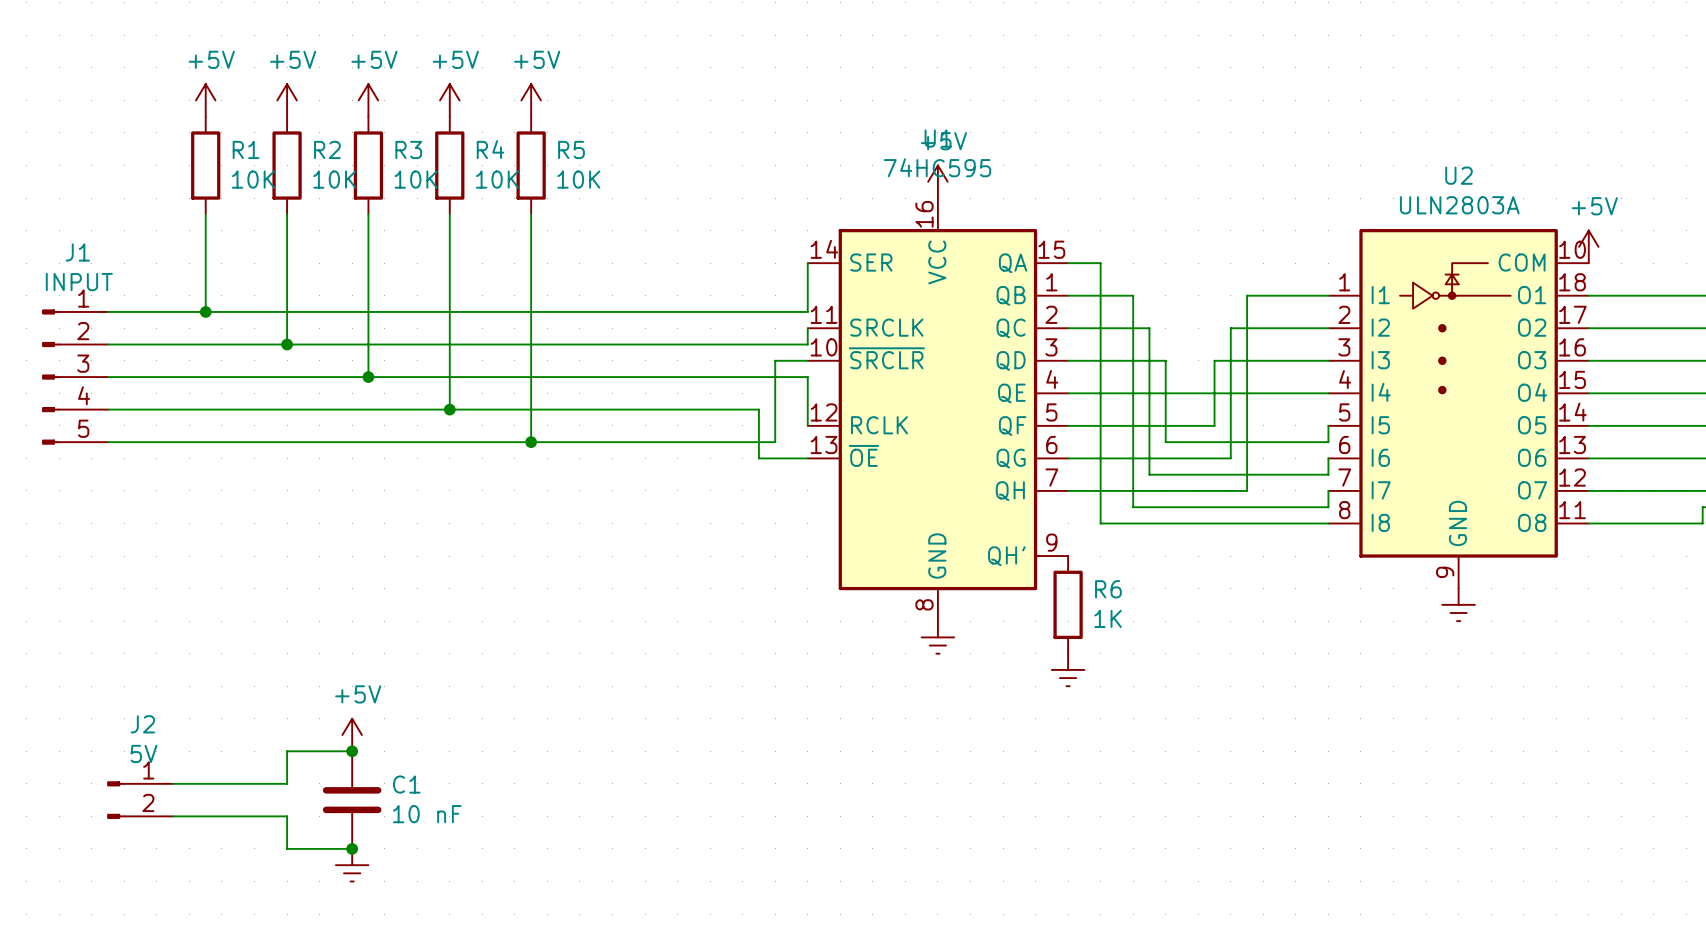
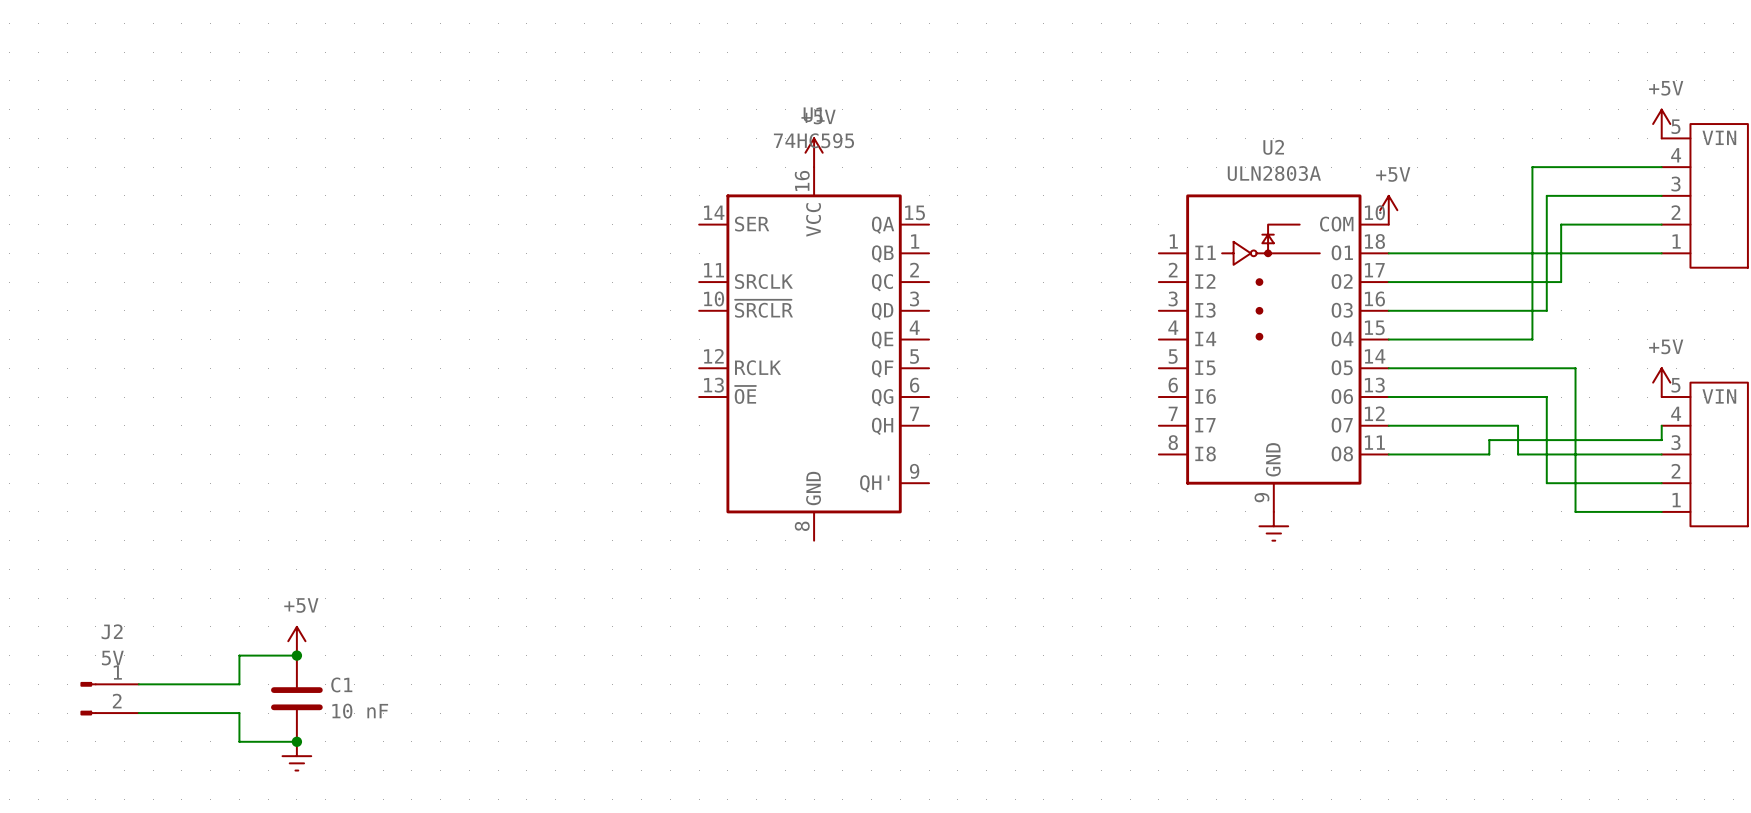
power symbol: +5V (205, 100) -> none
power symbol: +5V (287, 100) -> none
power symbol: +5V (368, 100) -> none
power symbol: +5V (449, 100) -> none
power symbol: +5V (531, 100) -> none
R1: 10K (205, 165) -> none
R2: 10K (287, 165) -> none
R3: 10K (368, 165) -> none
R4: 10K (449, 165) -> none
R5: 10K (531, 165) -> none
wire: (205, 214) (205, 311) -> none
wire: (287, 214) (287, 344) -> none
wire: (368, 214) (368, 377) -> none
wire: (449, 214) (449, 409) -> none
wire: (531, 214) (531, 442) -> none
wire: (807, 263) (807, 311) (108, 311) -> none
wire: (1068, 263) (1100, 263) (1100, 523) (1328, 523) -> none
wire: (1068, 295) (1133, 295) (1133, 507) (1328, 507) (1328, 490) -> none
wire: (1328, 295) (1247, 295) (1247, 490) (1068, 490) -> none
junction: (205, 311) -> none
wire: (807, 328) (807, 344) (108, 344) -> none
wire: (1068, 328) (1149, 328) (1149, 474) (1328, 474) (1328, 458) -> none
wire: (1328, 328) (1230, 328) (1230, 458) (1068, 458) -> none
junction: (287, 344) -> none
wire: (807, 360) (775, 360) (775, 442) (108, 442) -> none
wire: (1068, 360) (1165, 360) (1165, 442) (1328, 442) (1328, 425) -> none
wire: (1328, 360) (1214, 360) (1214, 425) (1068, 425) -> none
J1: INPUT (75, 377) -> none
wire: (108, 377) (807, 377) (807, 425) -> none
junction: (368, 377) -> none
wire: (1068, 393) (1328, 393) -> none
wire: (108, 409) (758, 409) (758, 458) (807, 458) -> none
junction: (449, 409) -> none
junction: (531, 442) -> none
R6: 1K (1068, 604) -> none
power symbol: (937, 637) -> none
power symbol: (1068, 669) -> none

